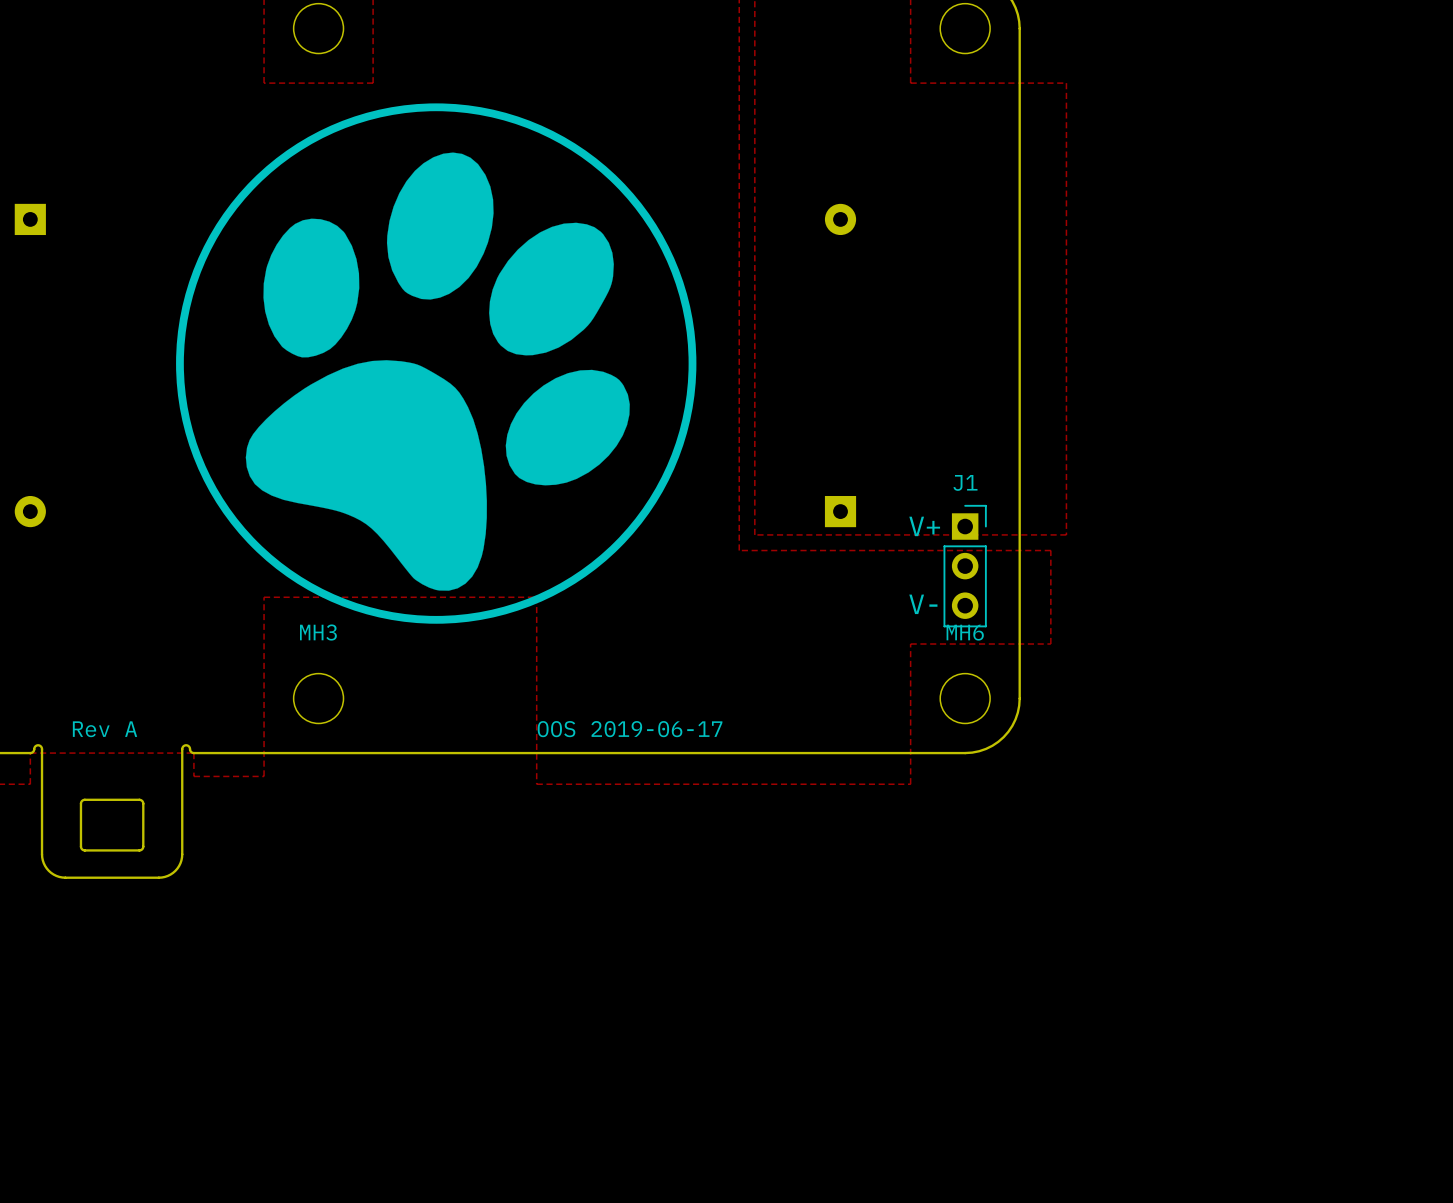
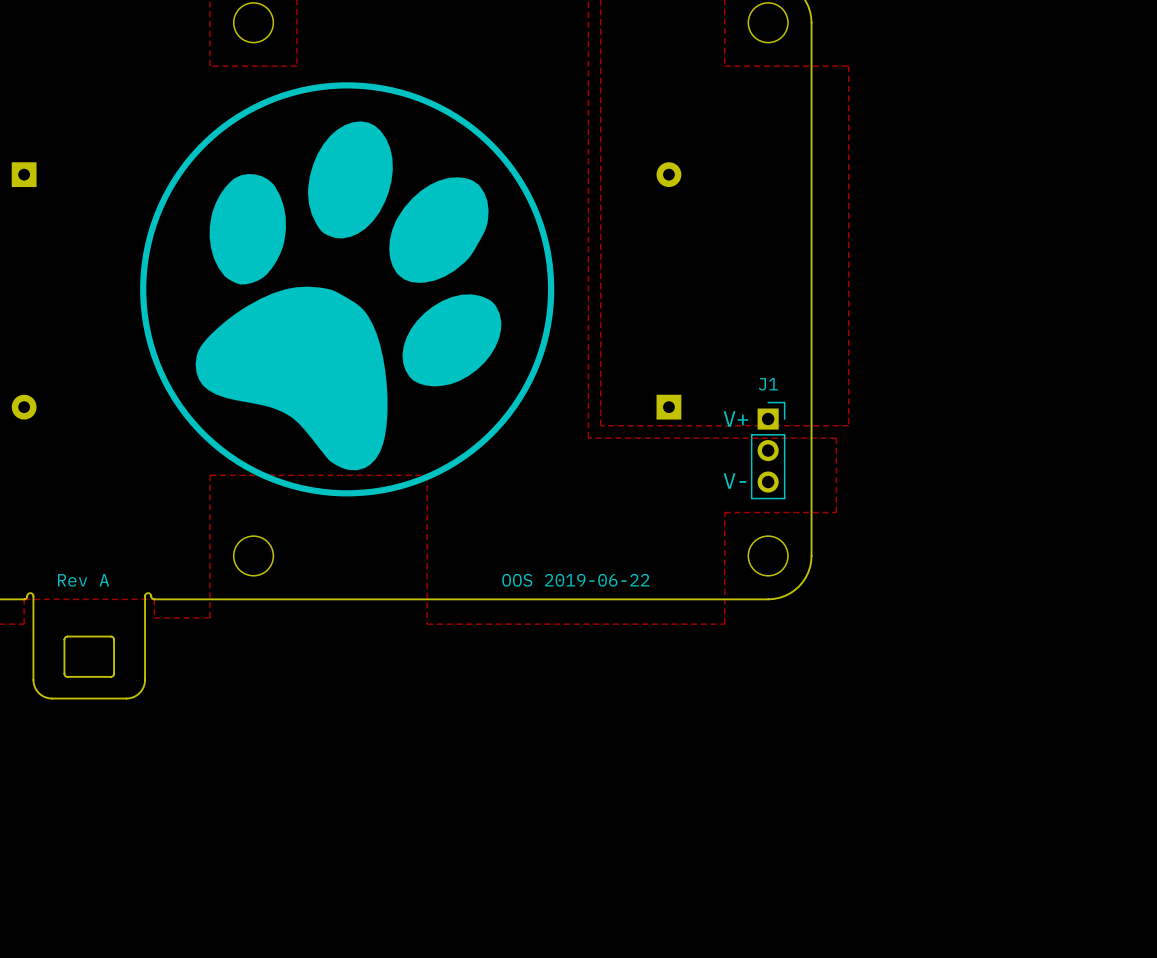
MH3 name: MH3 (318, 632) -> none
MH6 name: MH6 (965, 632) -> none
text: OOS 2019-06-17 (630, 729) -> OOS 2019-06-22 (575, 580)

